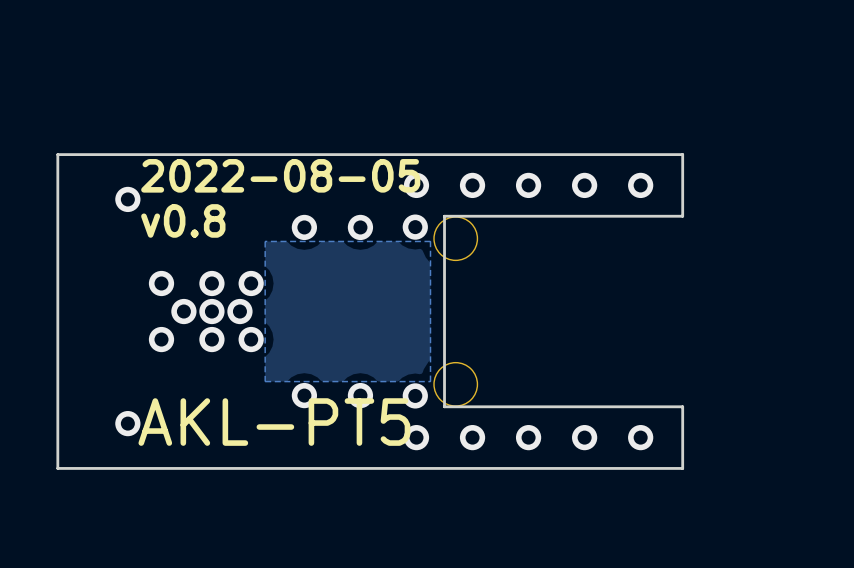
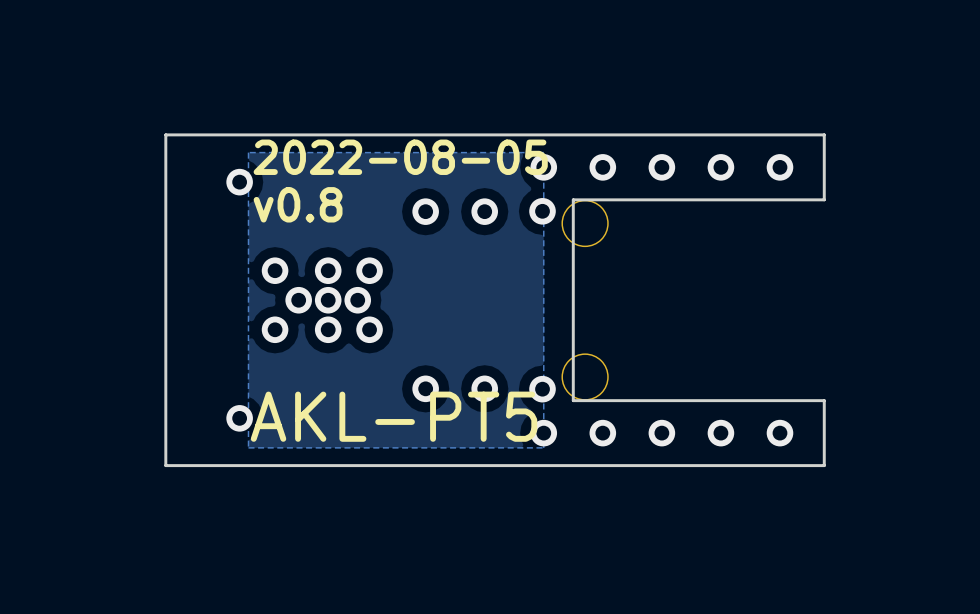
zone outline: none -> (543, 152) (543, 447) (248, 447) (248, 152) (543, 152)
zone outline: (430, 241) (430, 381) (265, 381) (265, 241) (430, 241) -> none

